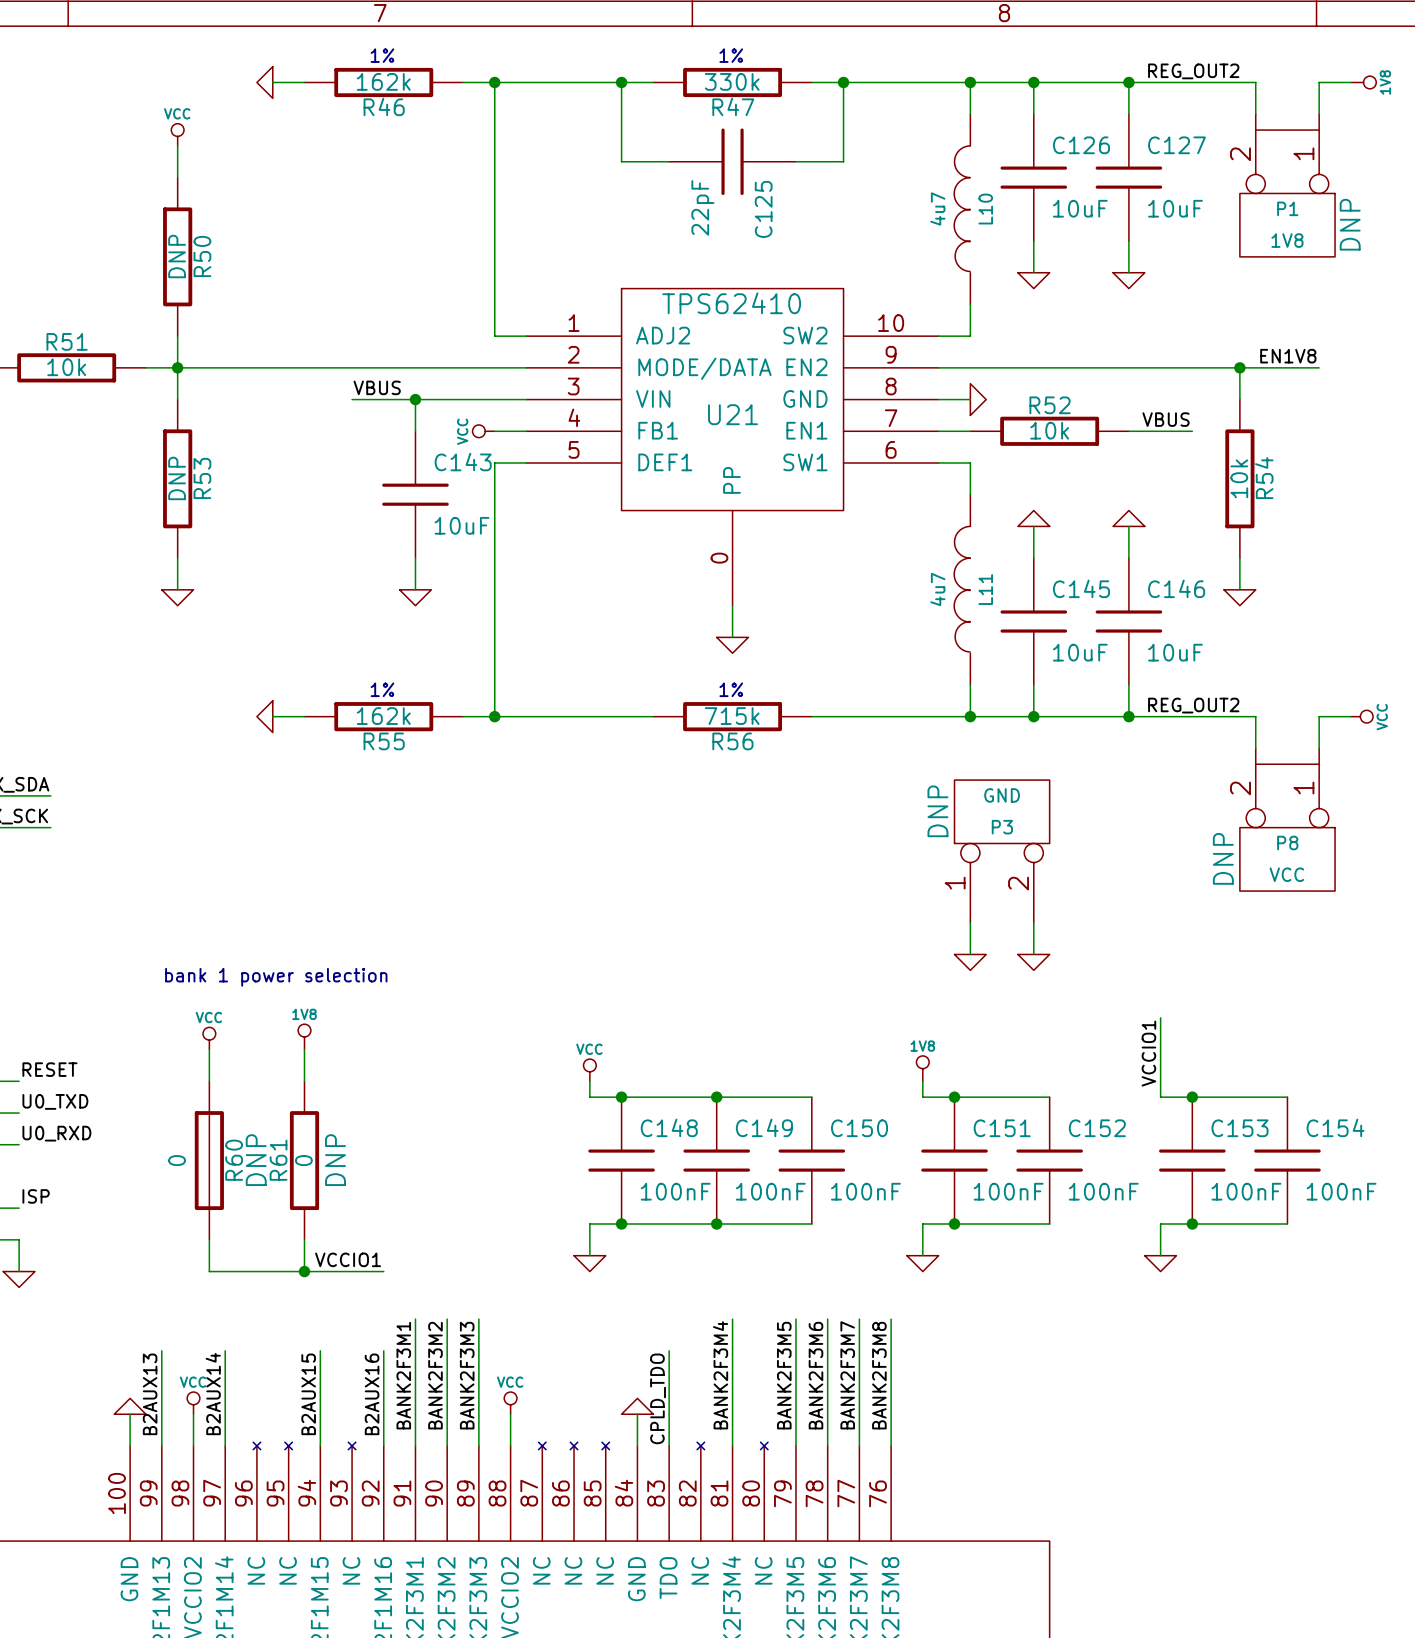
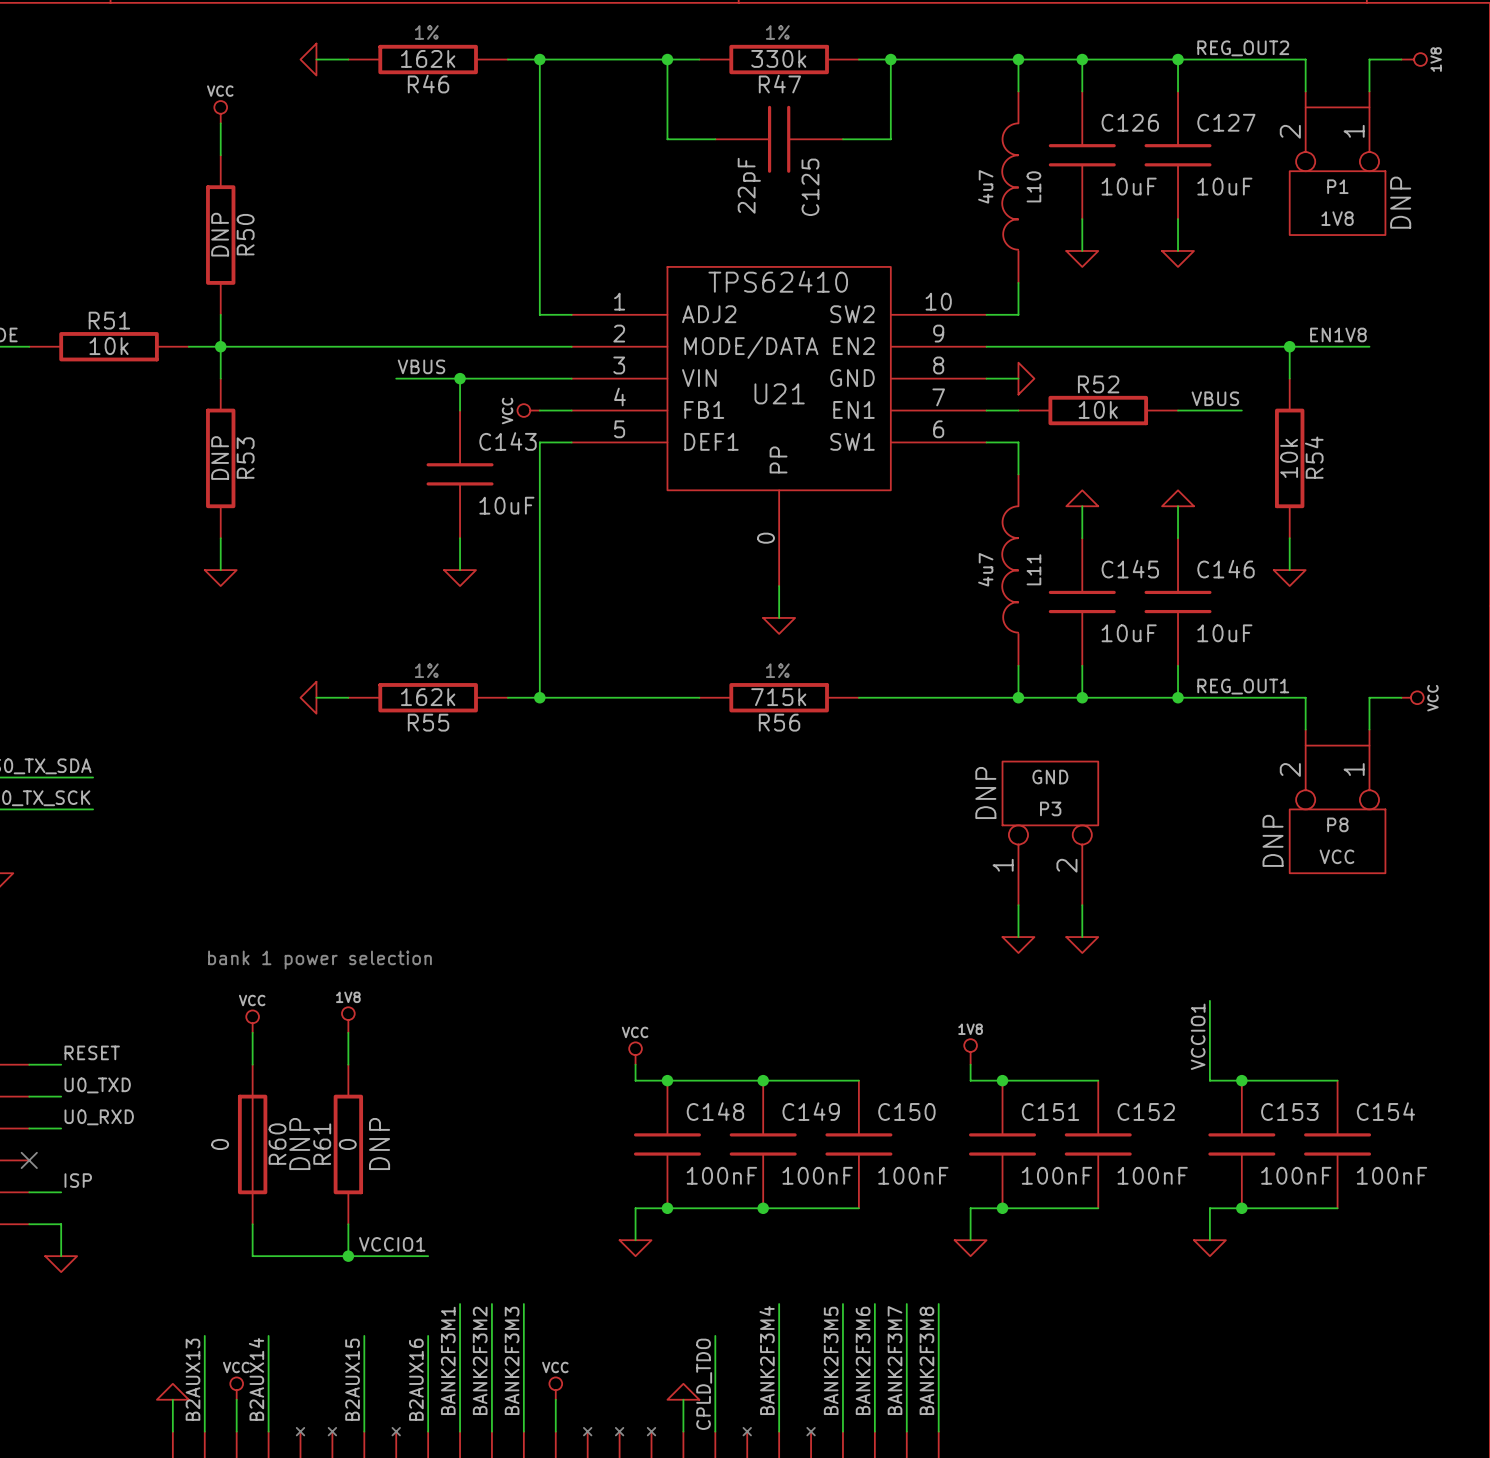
label: REG_OUT2 (1193, 705) -> REG_OUT1 (1243, 686)

